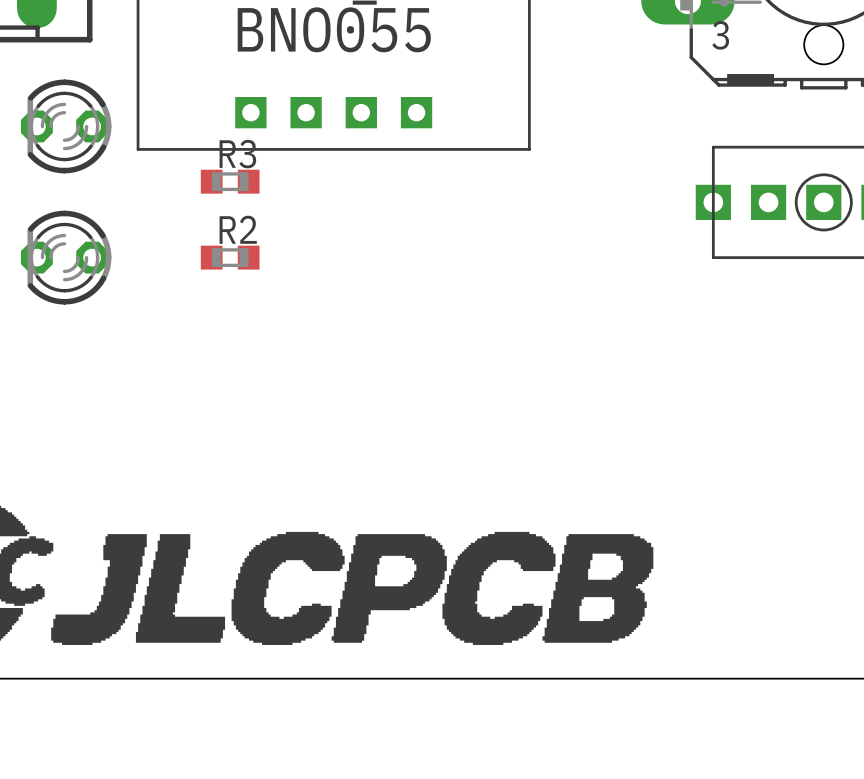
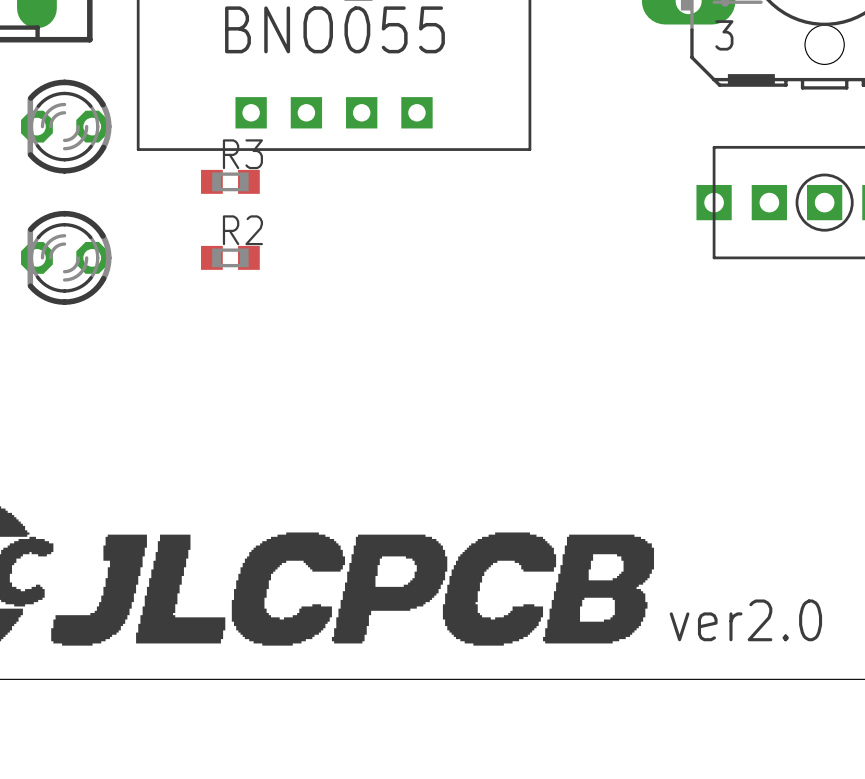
text: none -> ver2.0 (745, 620)

